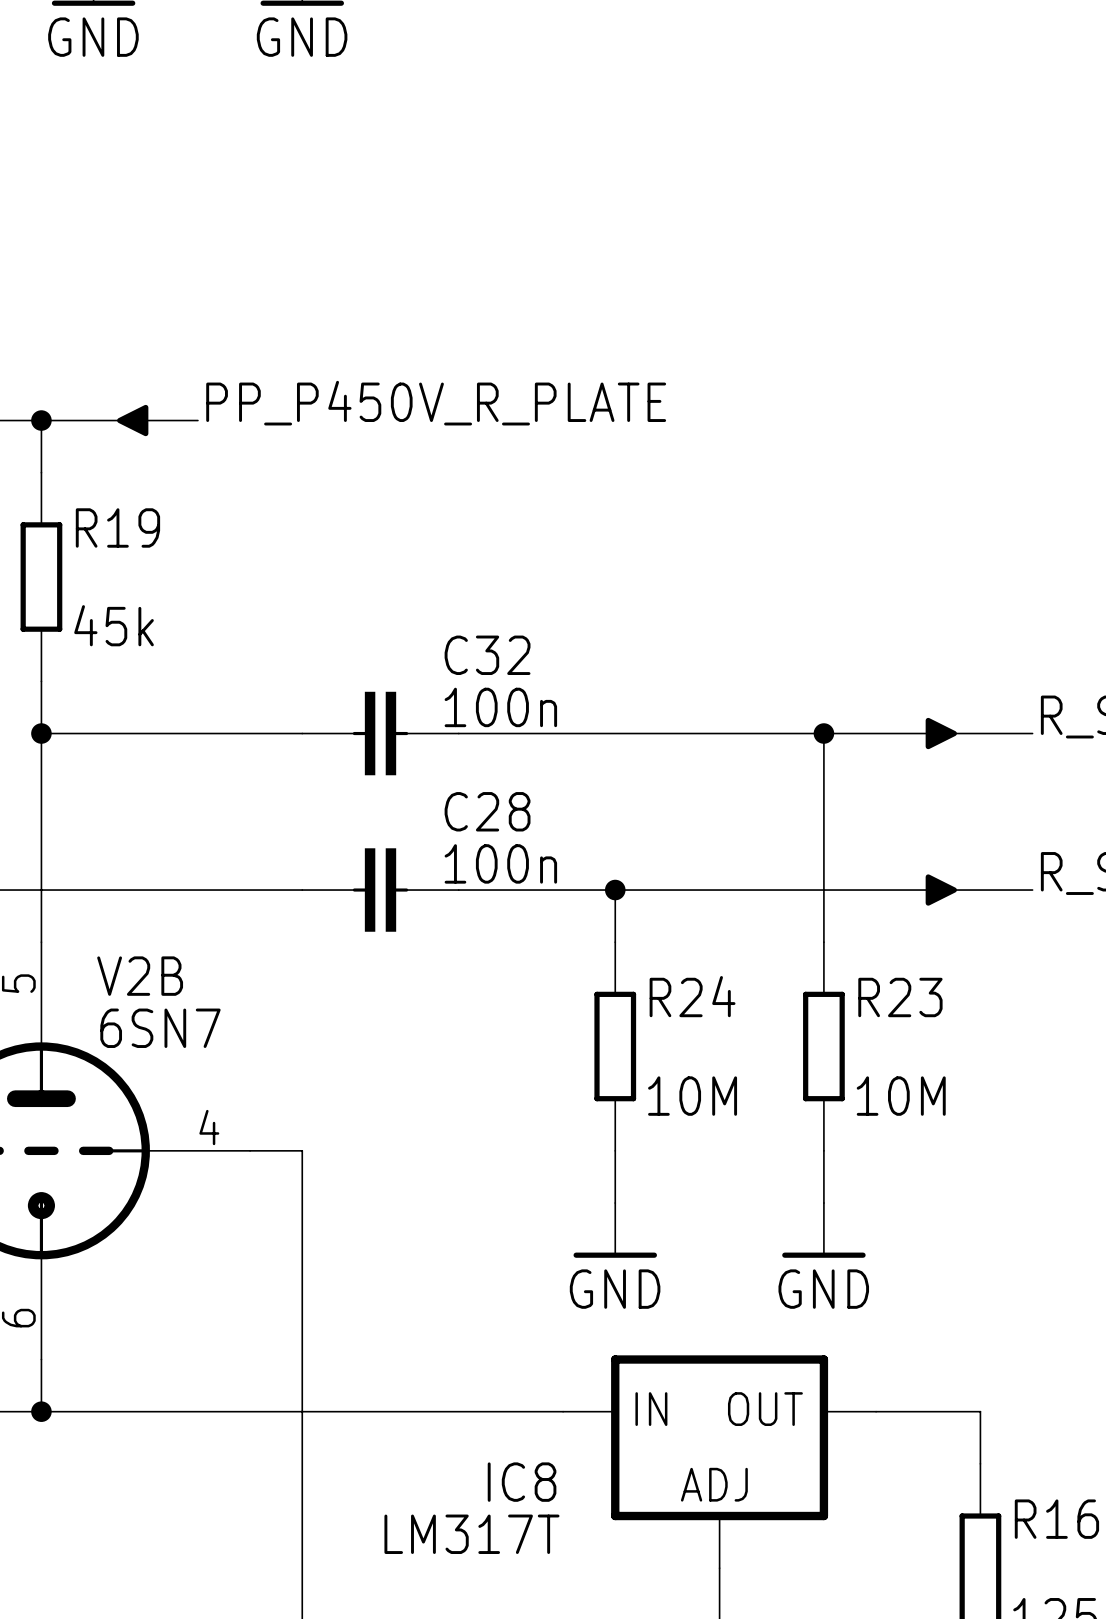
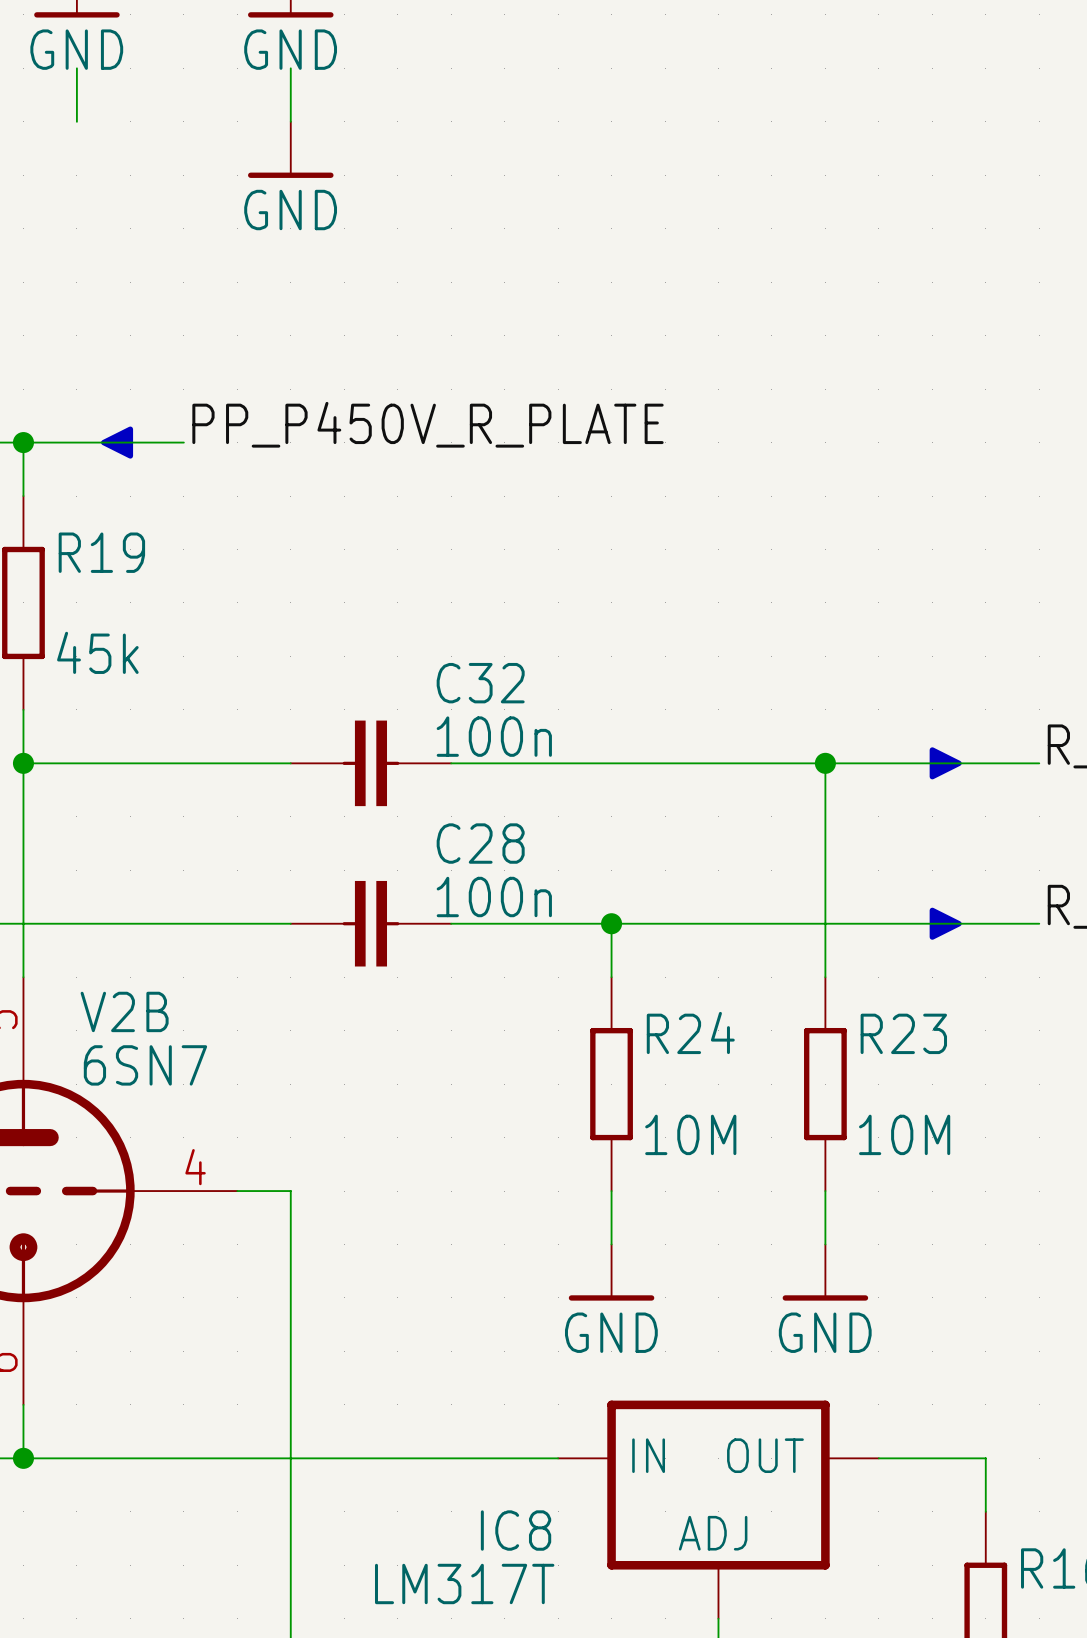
wire: none -> (76, 68) (76, 121)
wire: none -> (290, 68) (290, 121)
power symbol: none -> GND (290, 149)

